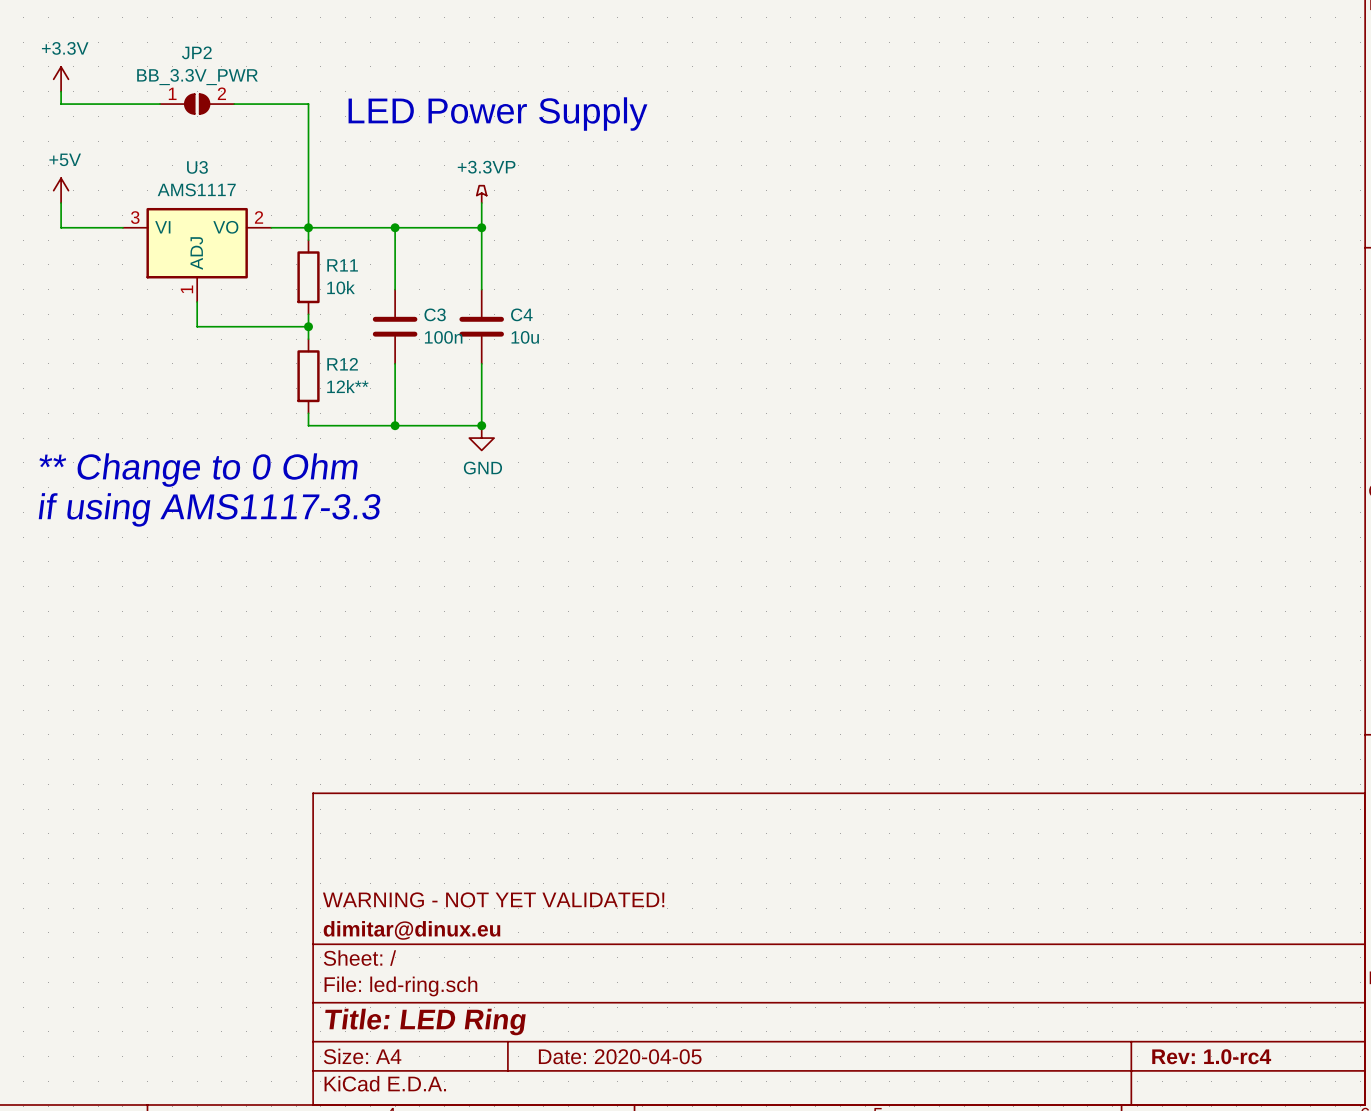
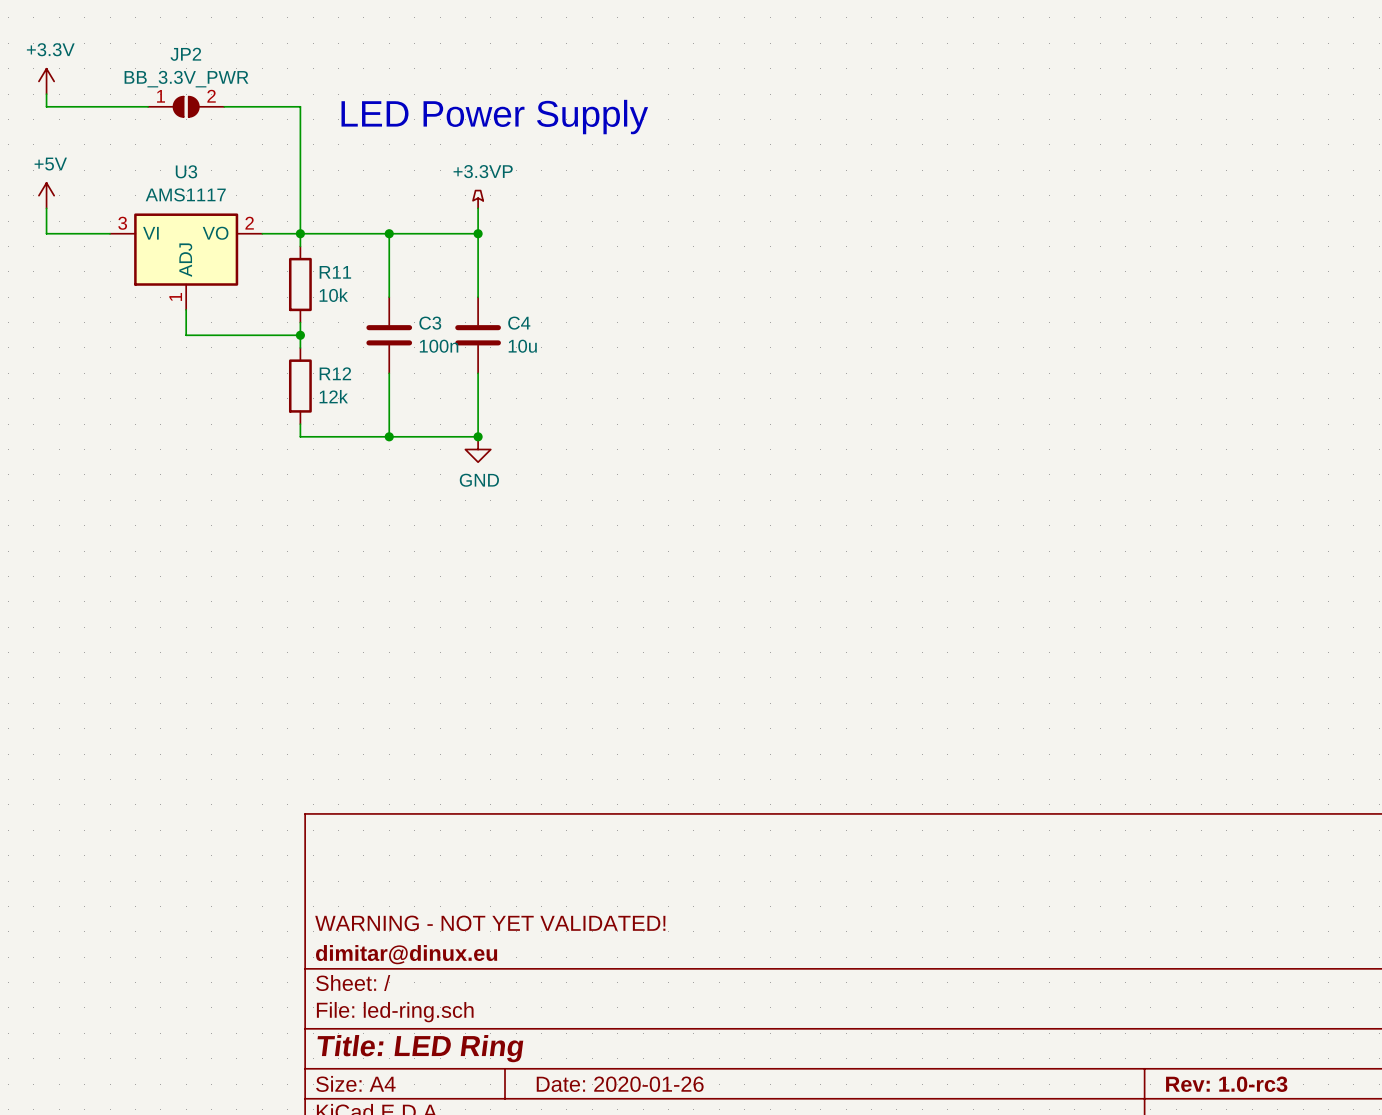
R12 value: 12k** (347, 386) -> 12k (333, 396)
text: ** Change to 0 Ohm (198, 470) -> none
text: if using AMS1117-3.3 (209, 509) -> none
title block: Date: 2020-04-05 (620, 1056) -> Date: 2020-01-26 (620, 1084)
title block: Rev: 1.0-rc4 (1211, 1056) -> Rev: 1.0-rc3 (1226, 1084)

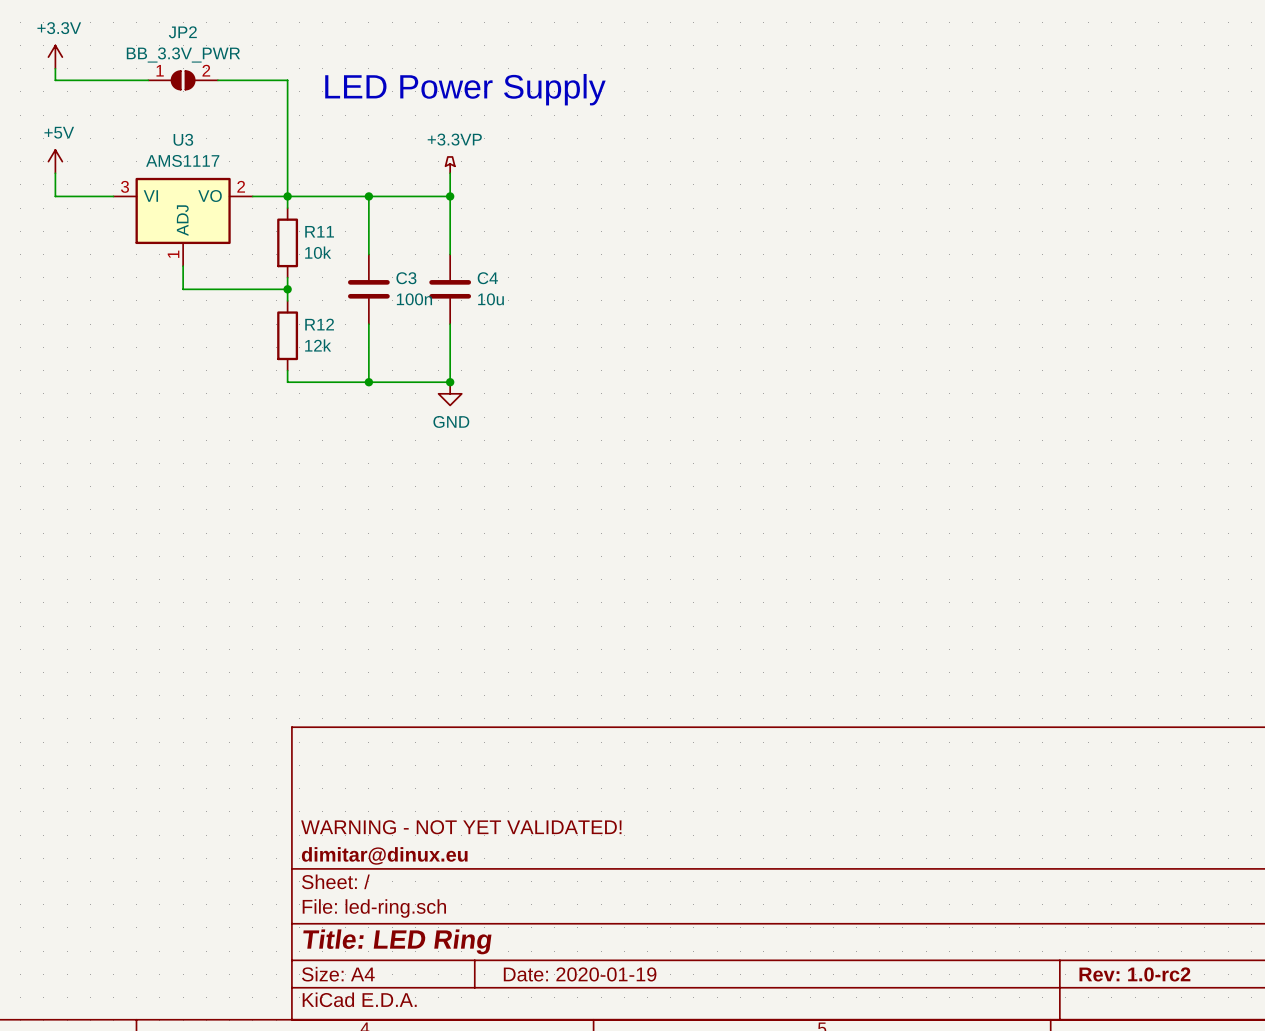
title block: Date: 2020-01-26 (620, 1084) -> Date: 2020-01-19 (580, 974)
title block: Rev: 1.0-rc3 (1226, 1084) -> Rev: 1.0-rc2 (1134, 974)

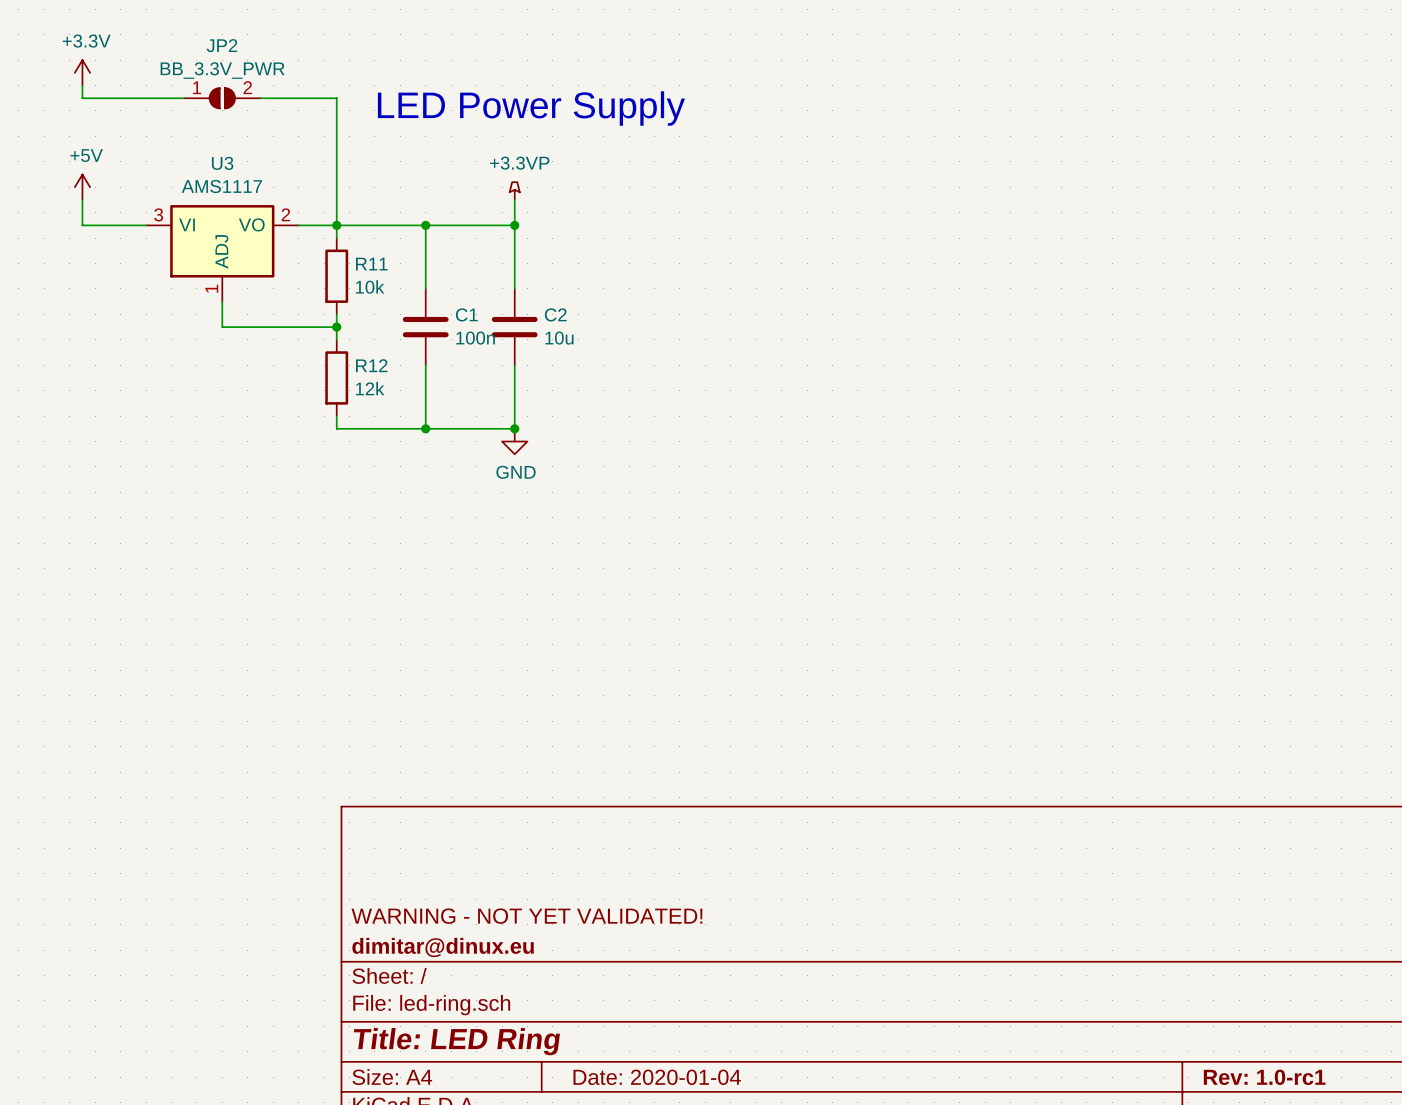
C3 name: C3 (406, 278) -> C1 (466, 314)
C4 name: C4 (487, 278) -> C2 (555, 314)
title block: Date: 2020-01-19 (580, 974) -> Date: 2020-01-04 (657, 1077)
title block: Rev: 1.0-rc2 (1134, 974) -> Rev: 1.0-rc1 (1264, 1077)

